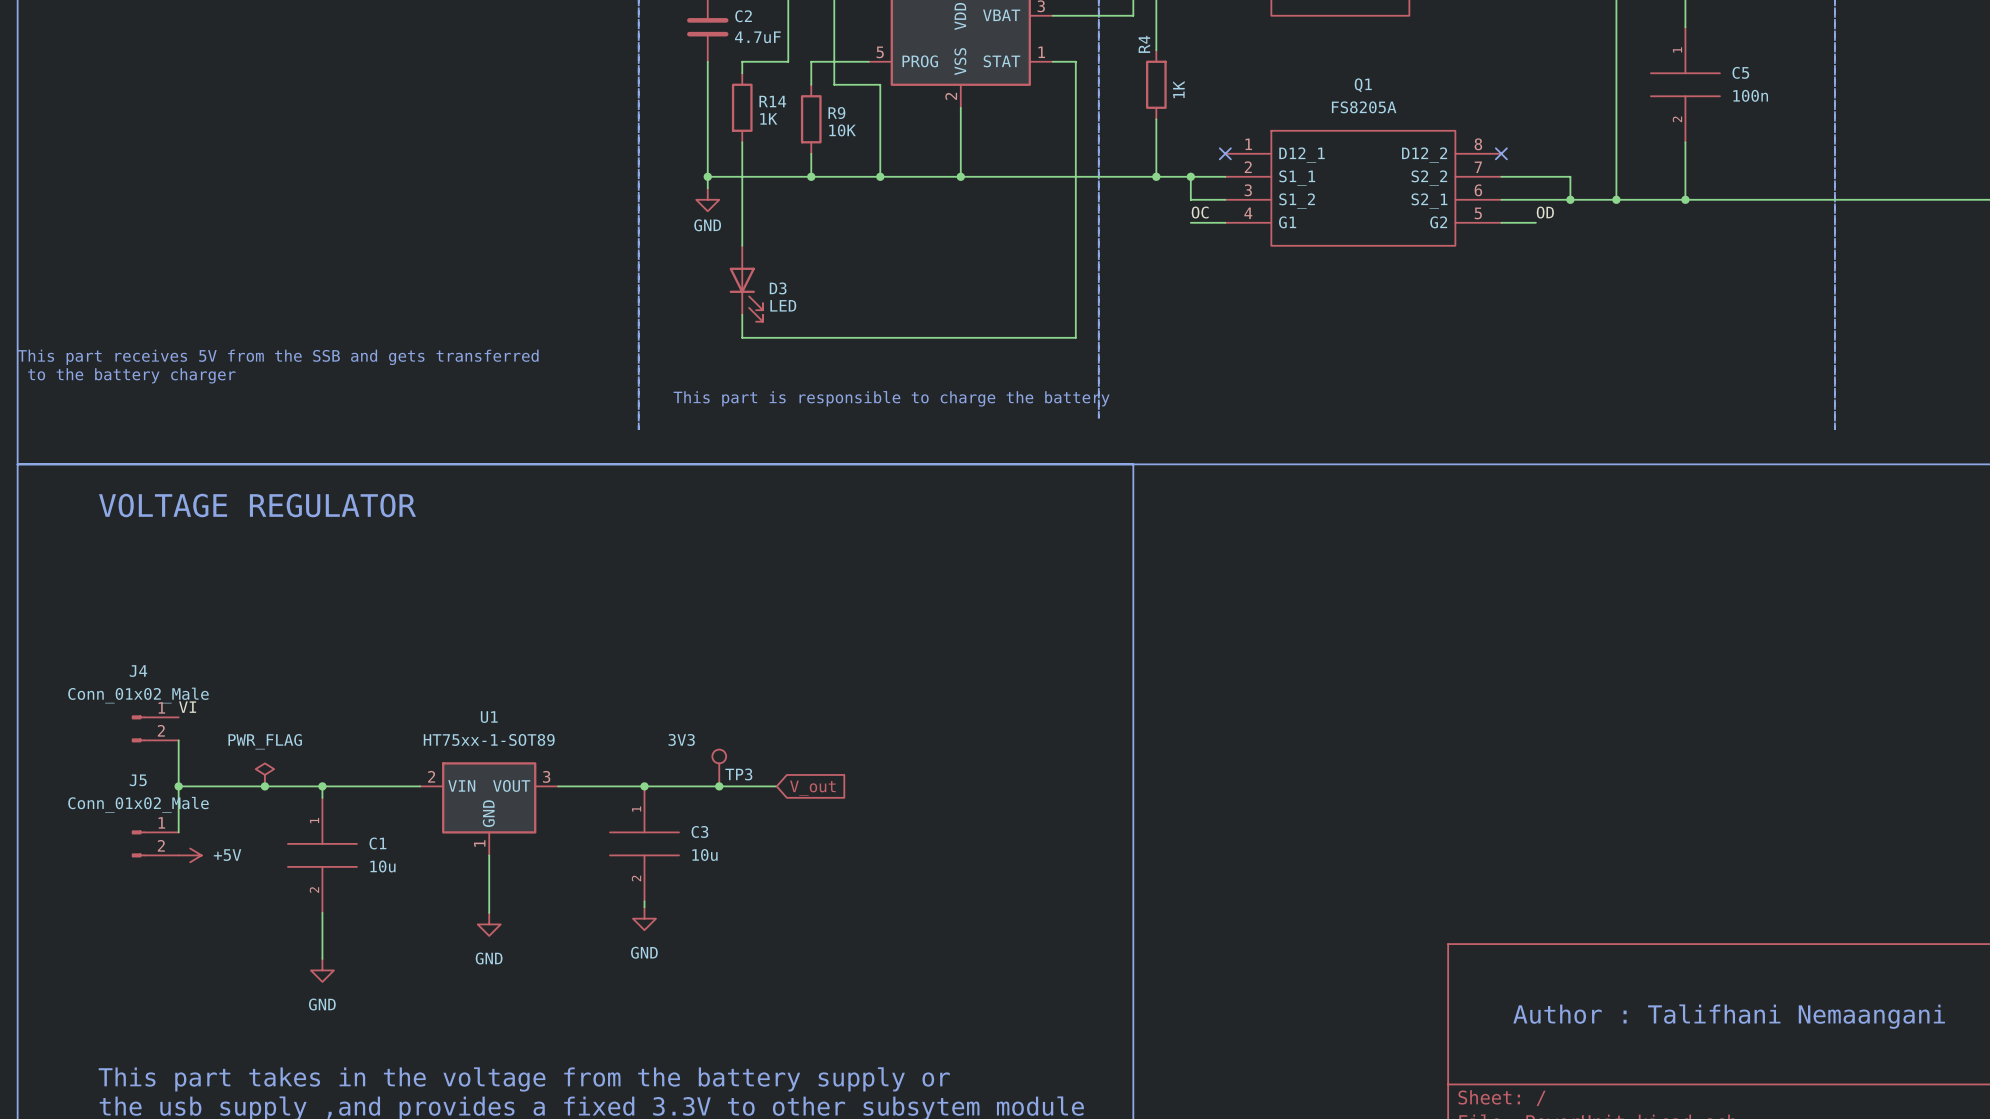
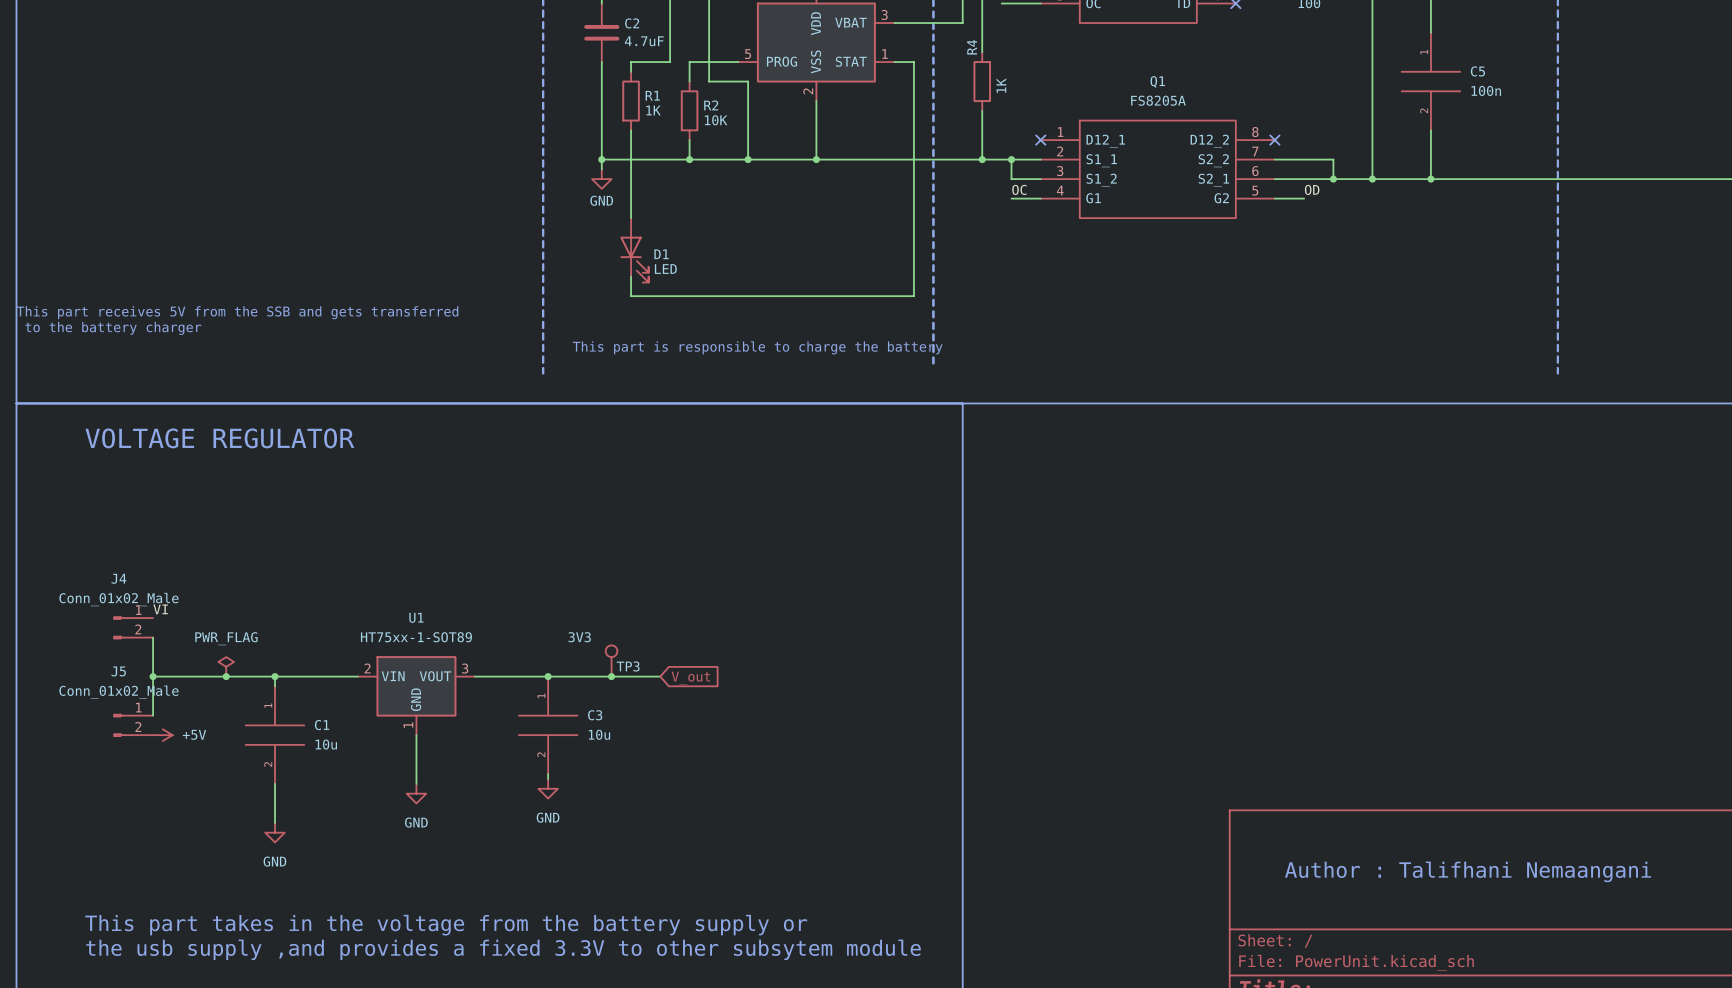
R14 name: R14 (772, 101) -> R1 (652, 95)
R9 name: R9 (836, 113) -> R2 (711, 105)
D3 name: D3 (778, 288) -> D1 (661, 254)

